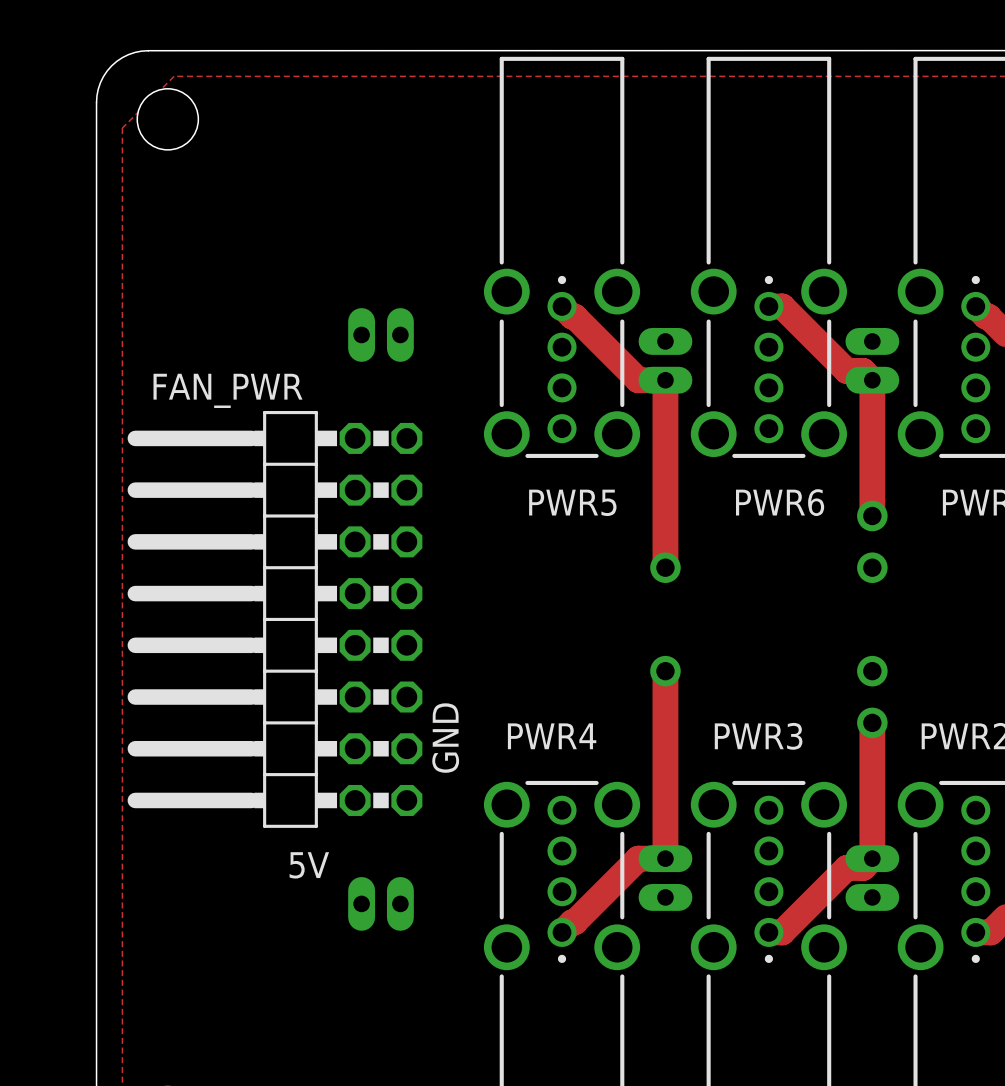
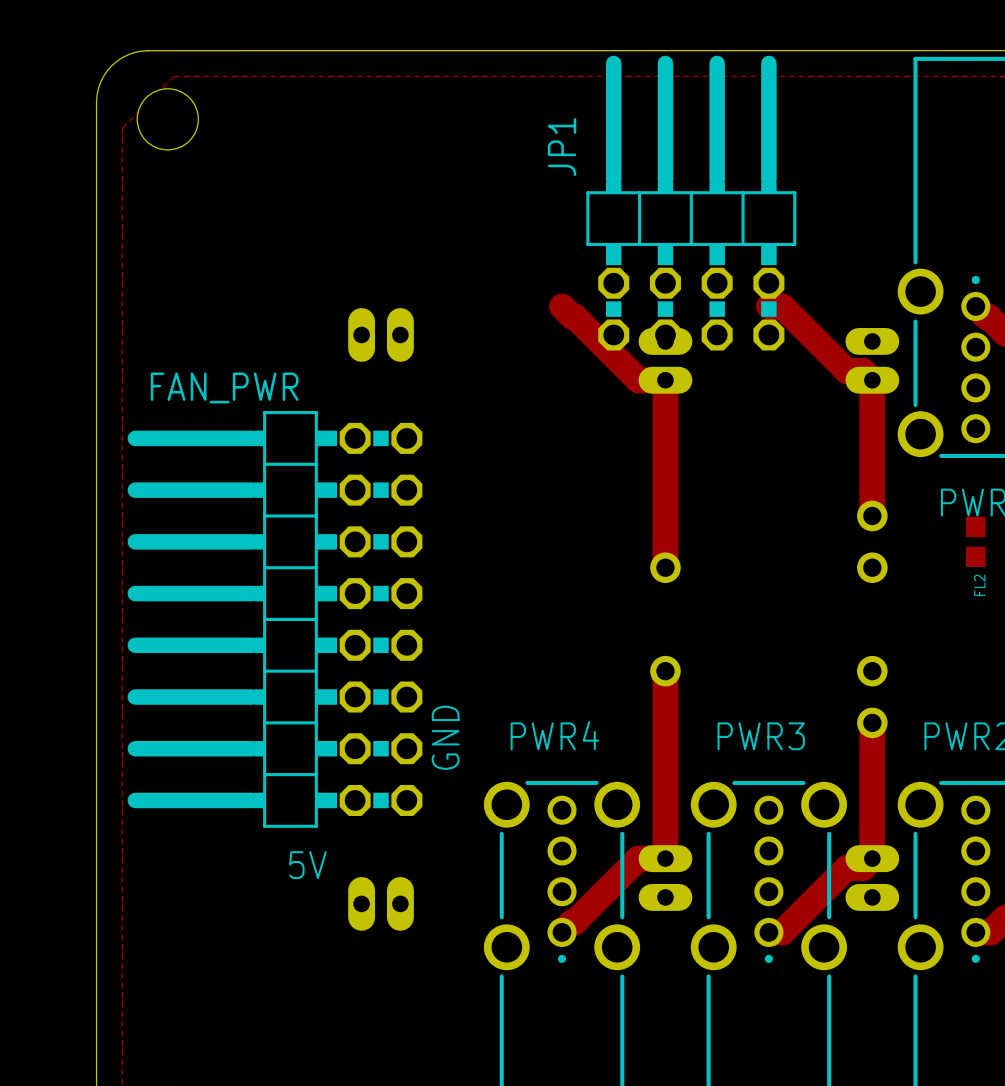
JP1: none -> (691, 203)
PWR5: (562, 257) -> none
PWR6: (768, 257) -> none
FL2: none -> (975, 541)

